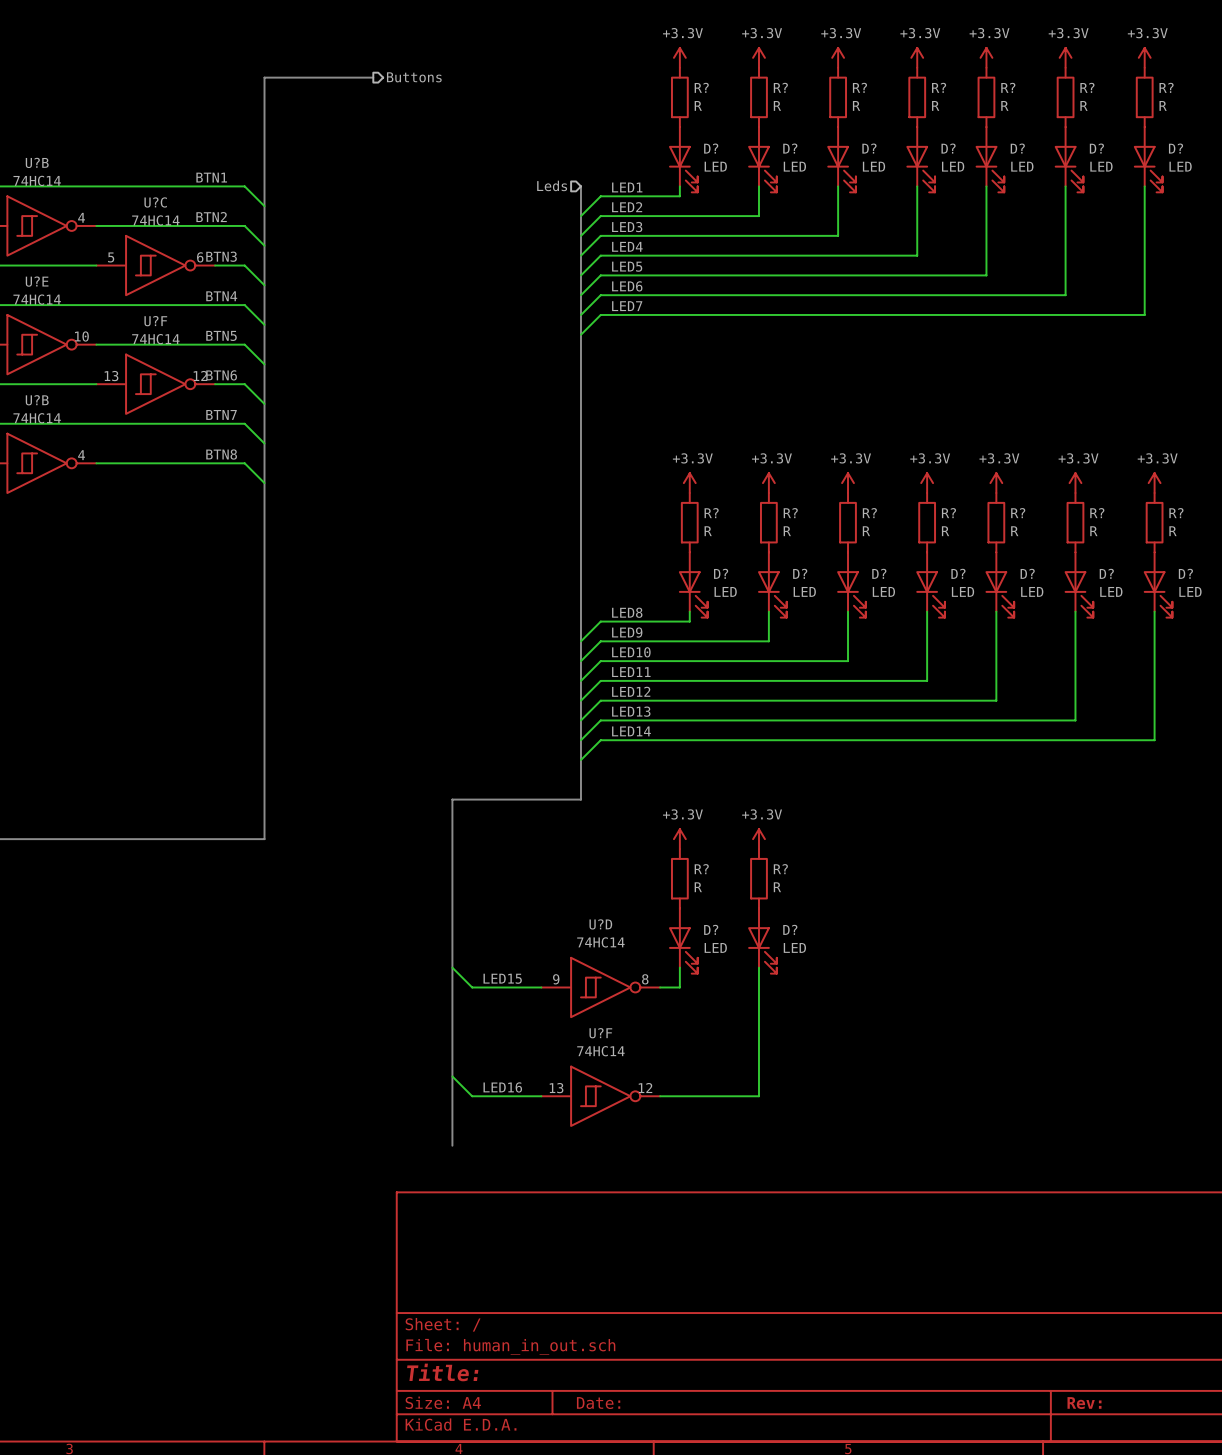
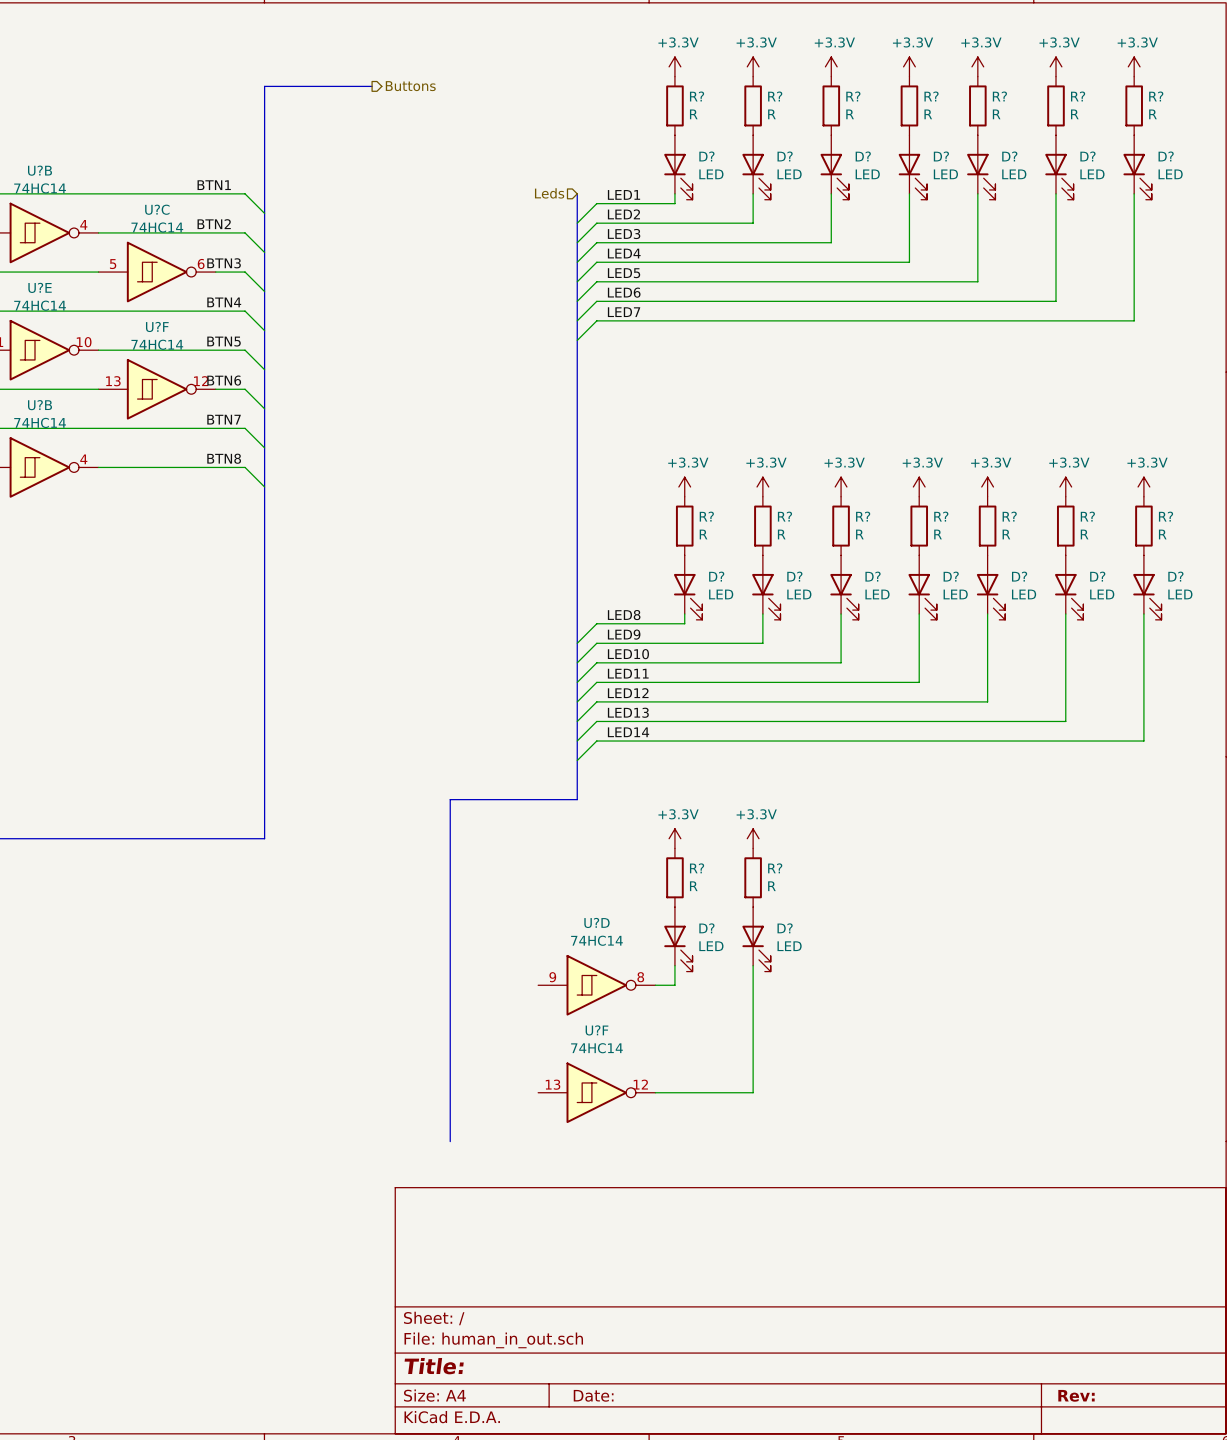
wire: (452, 967) (472, 987) (541, 987) -> none
label: LED15 (502, 978) -> none
wire: (452, 1076) (472, 1096) (541, 1096) -> none
label: LED16 (502, 1087) -> none

